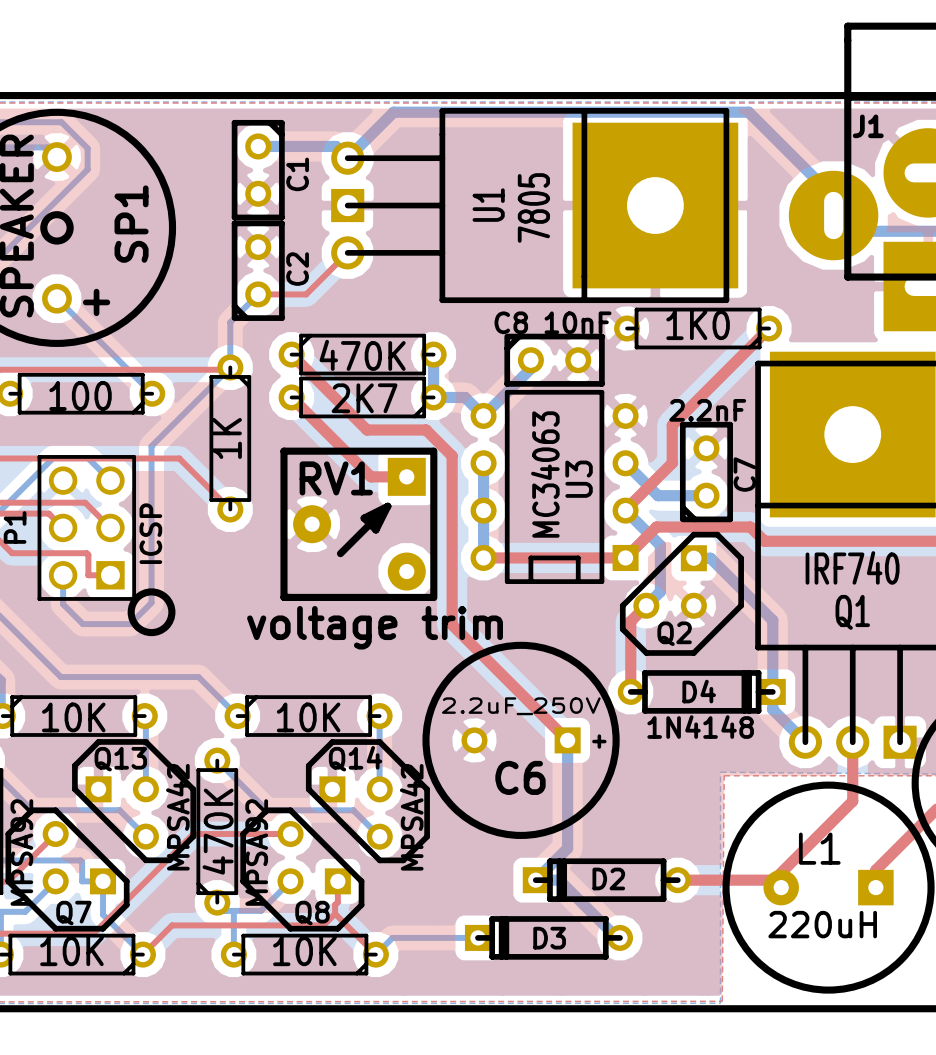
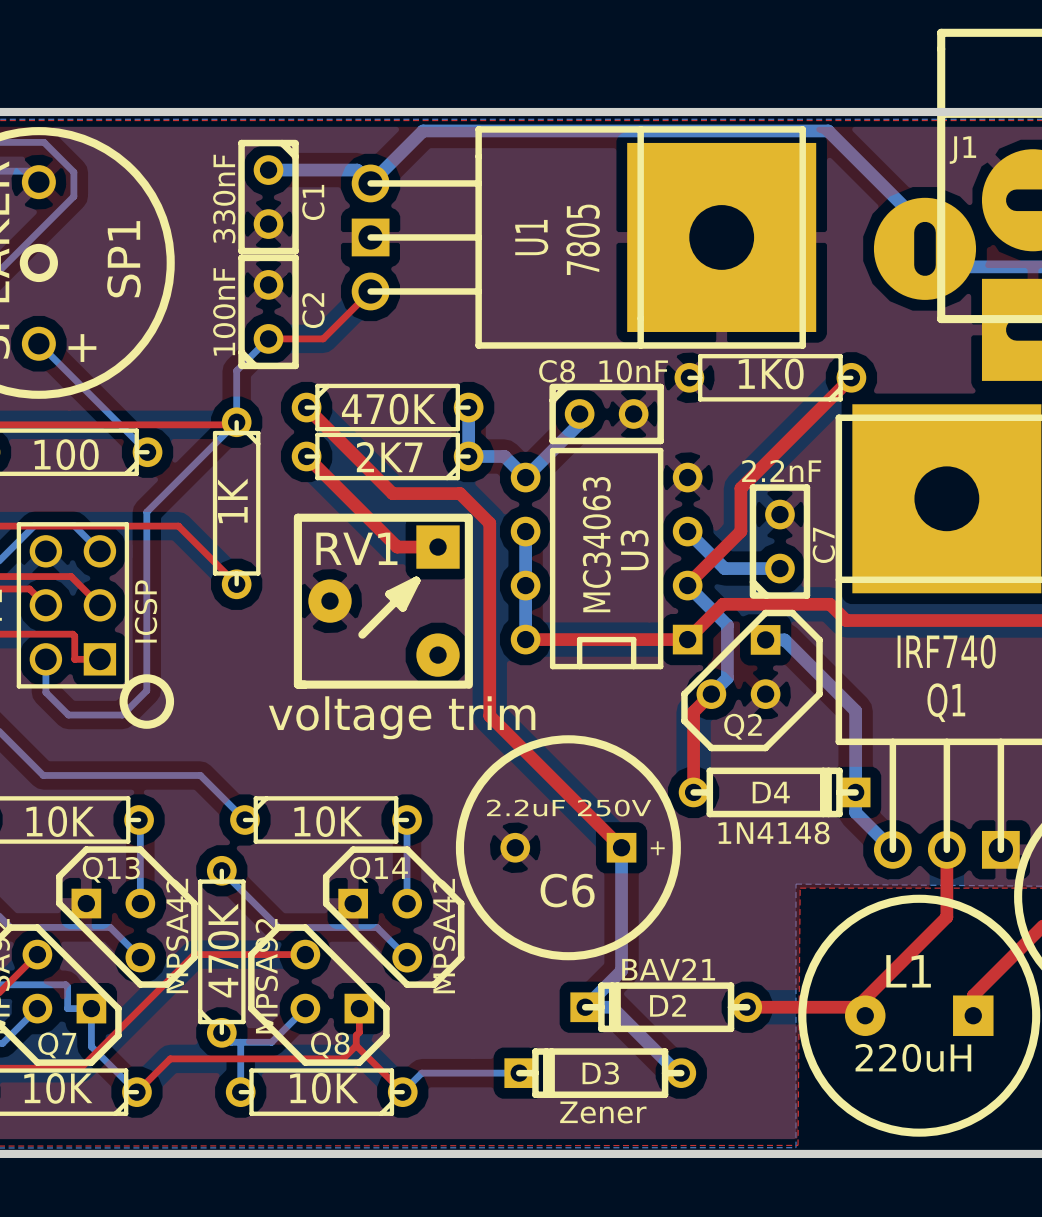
C1 value: none -> 330nF (224, 198)
C2 value: none -> 100nF (224, 311)
C6 value: 2.2uF_250V (521, 706) -> 2.2uF 250V (569, 808)
D2 value: none -> BAV21 (668, 969)
D3 value: none -> Zener (603, 1112)

